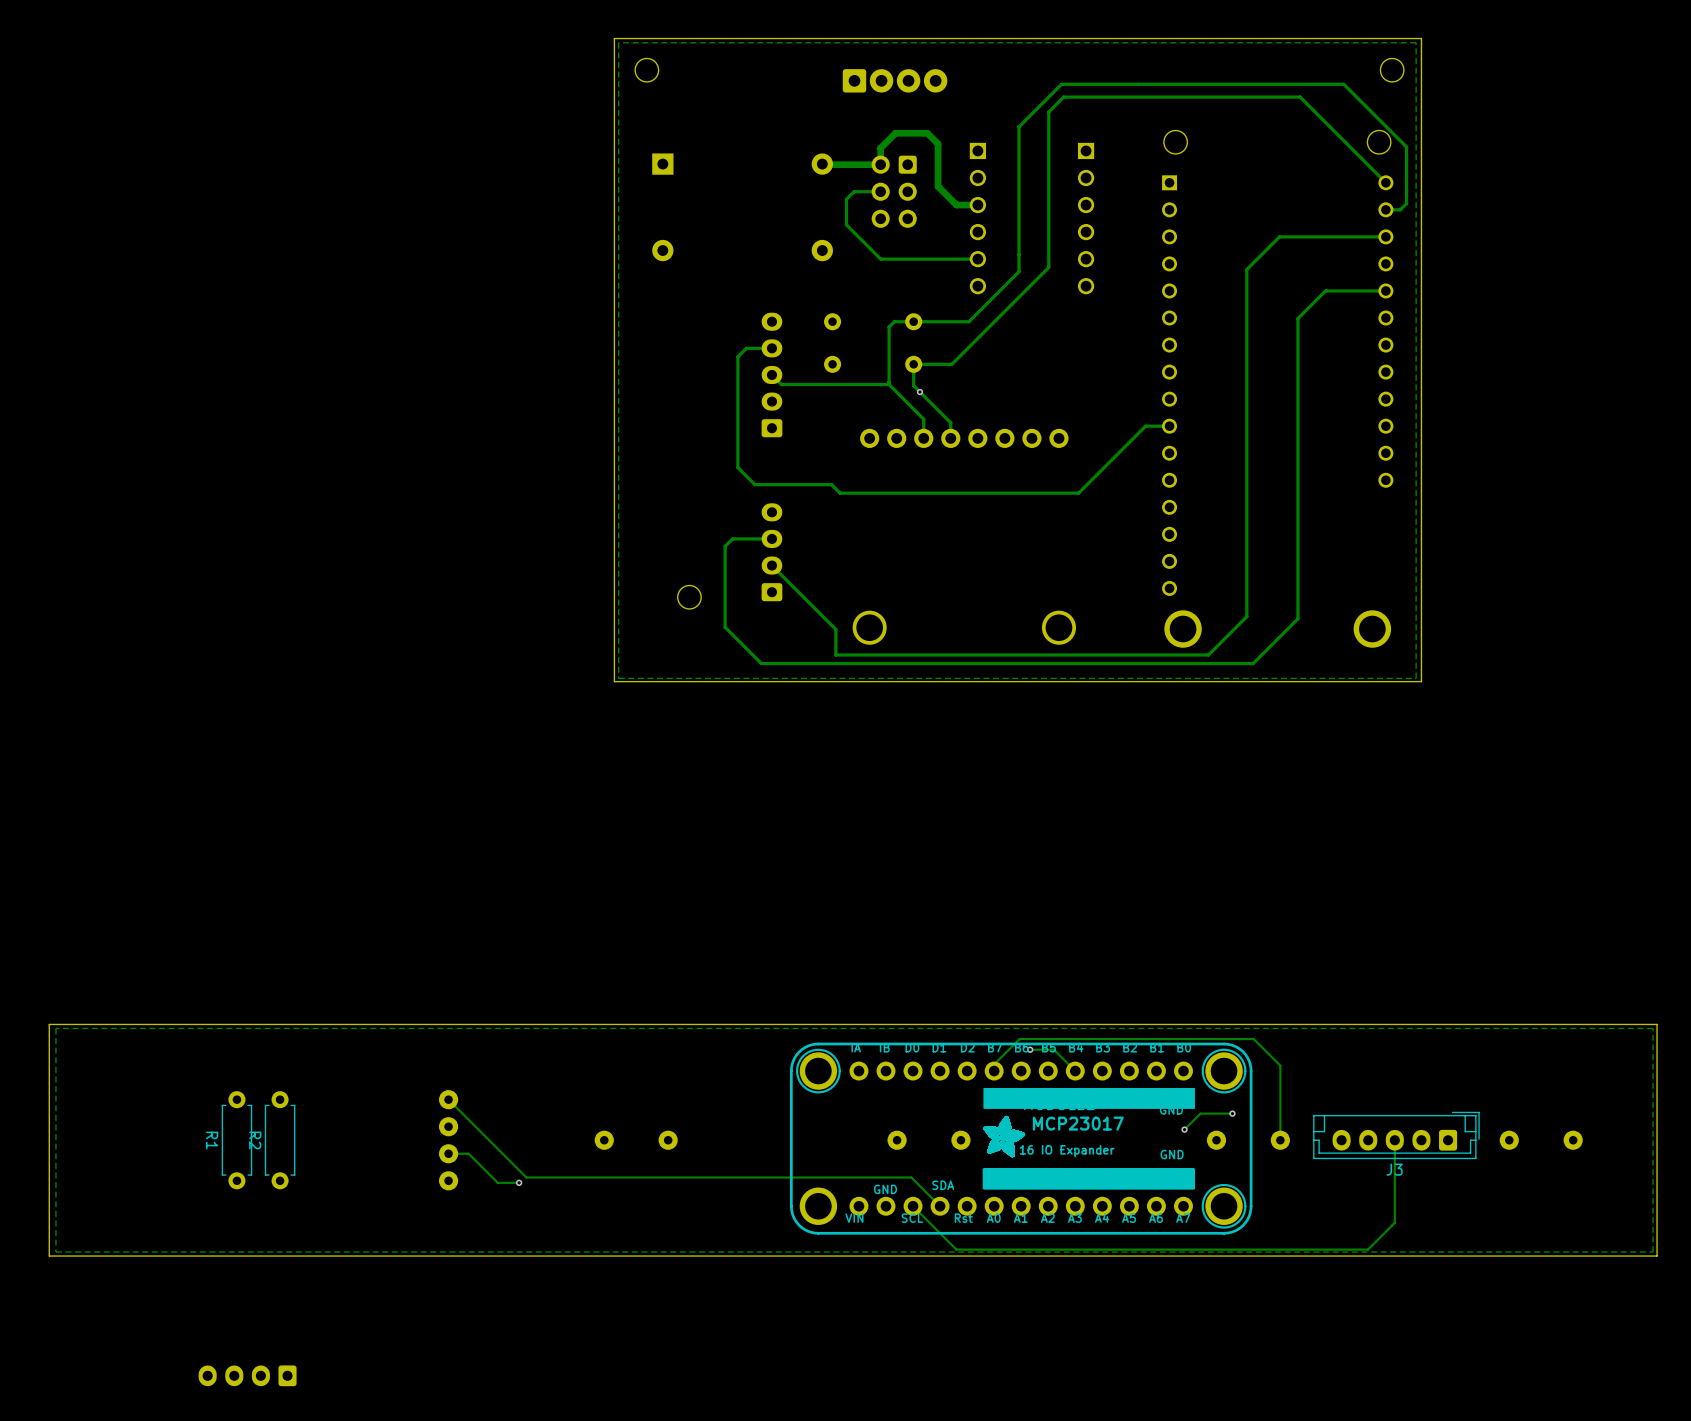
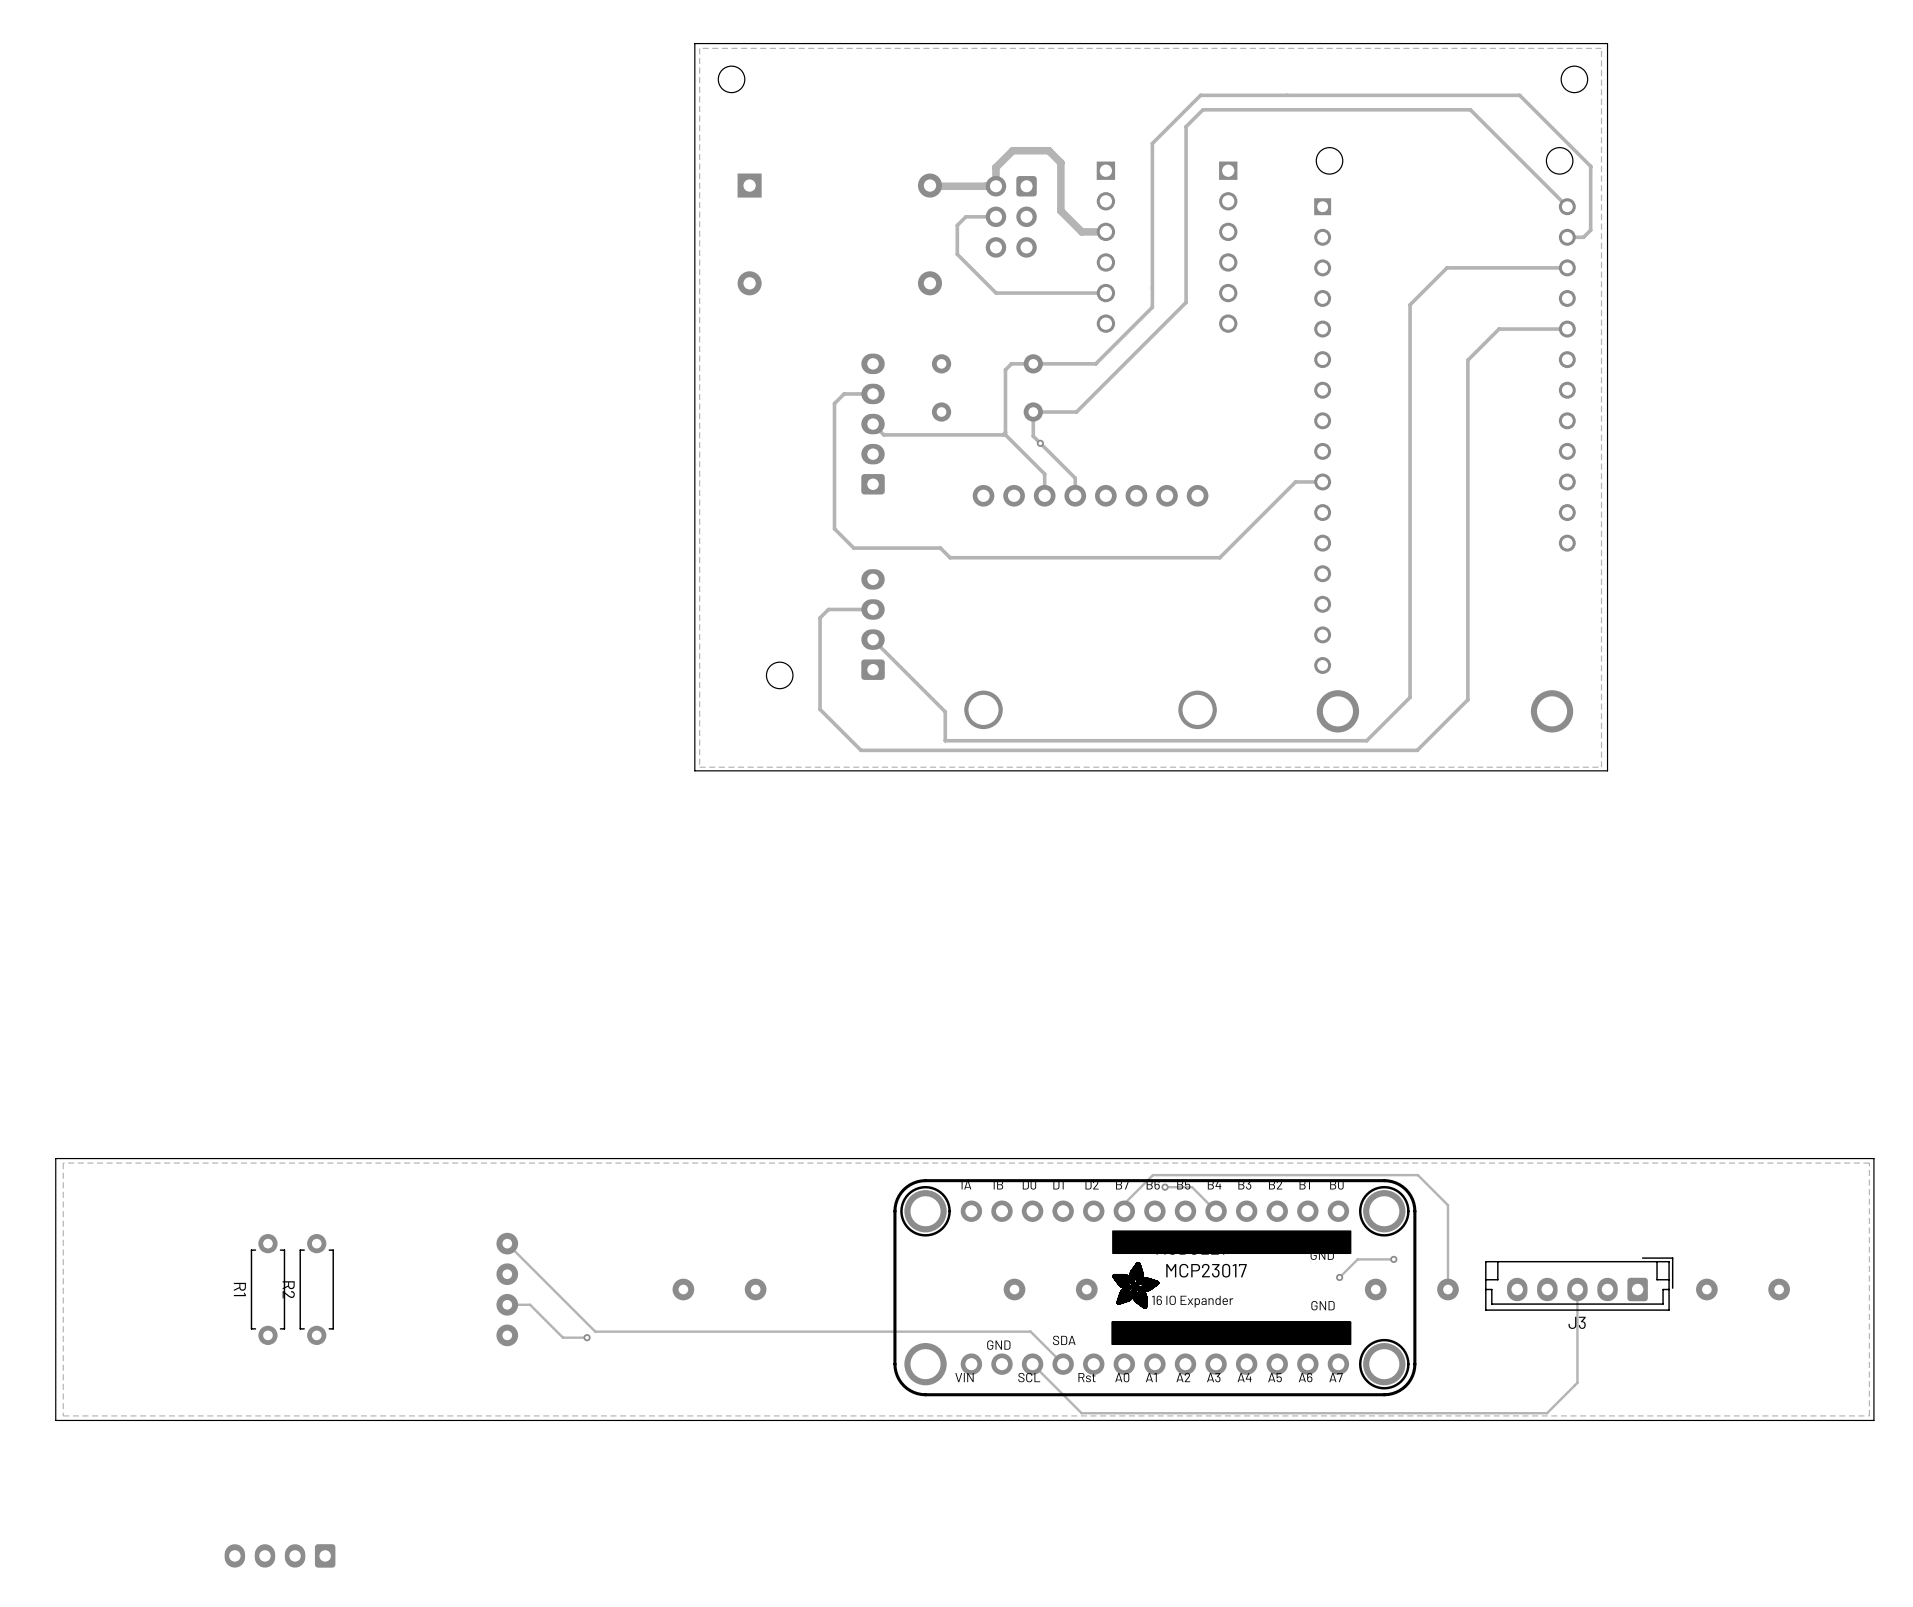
part: (895, 80) -> none

